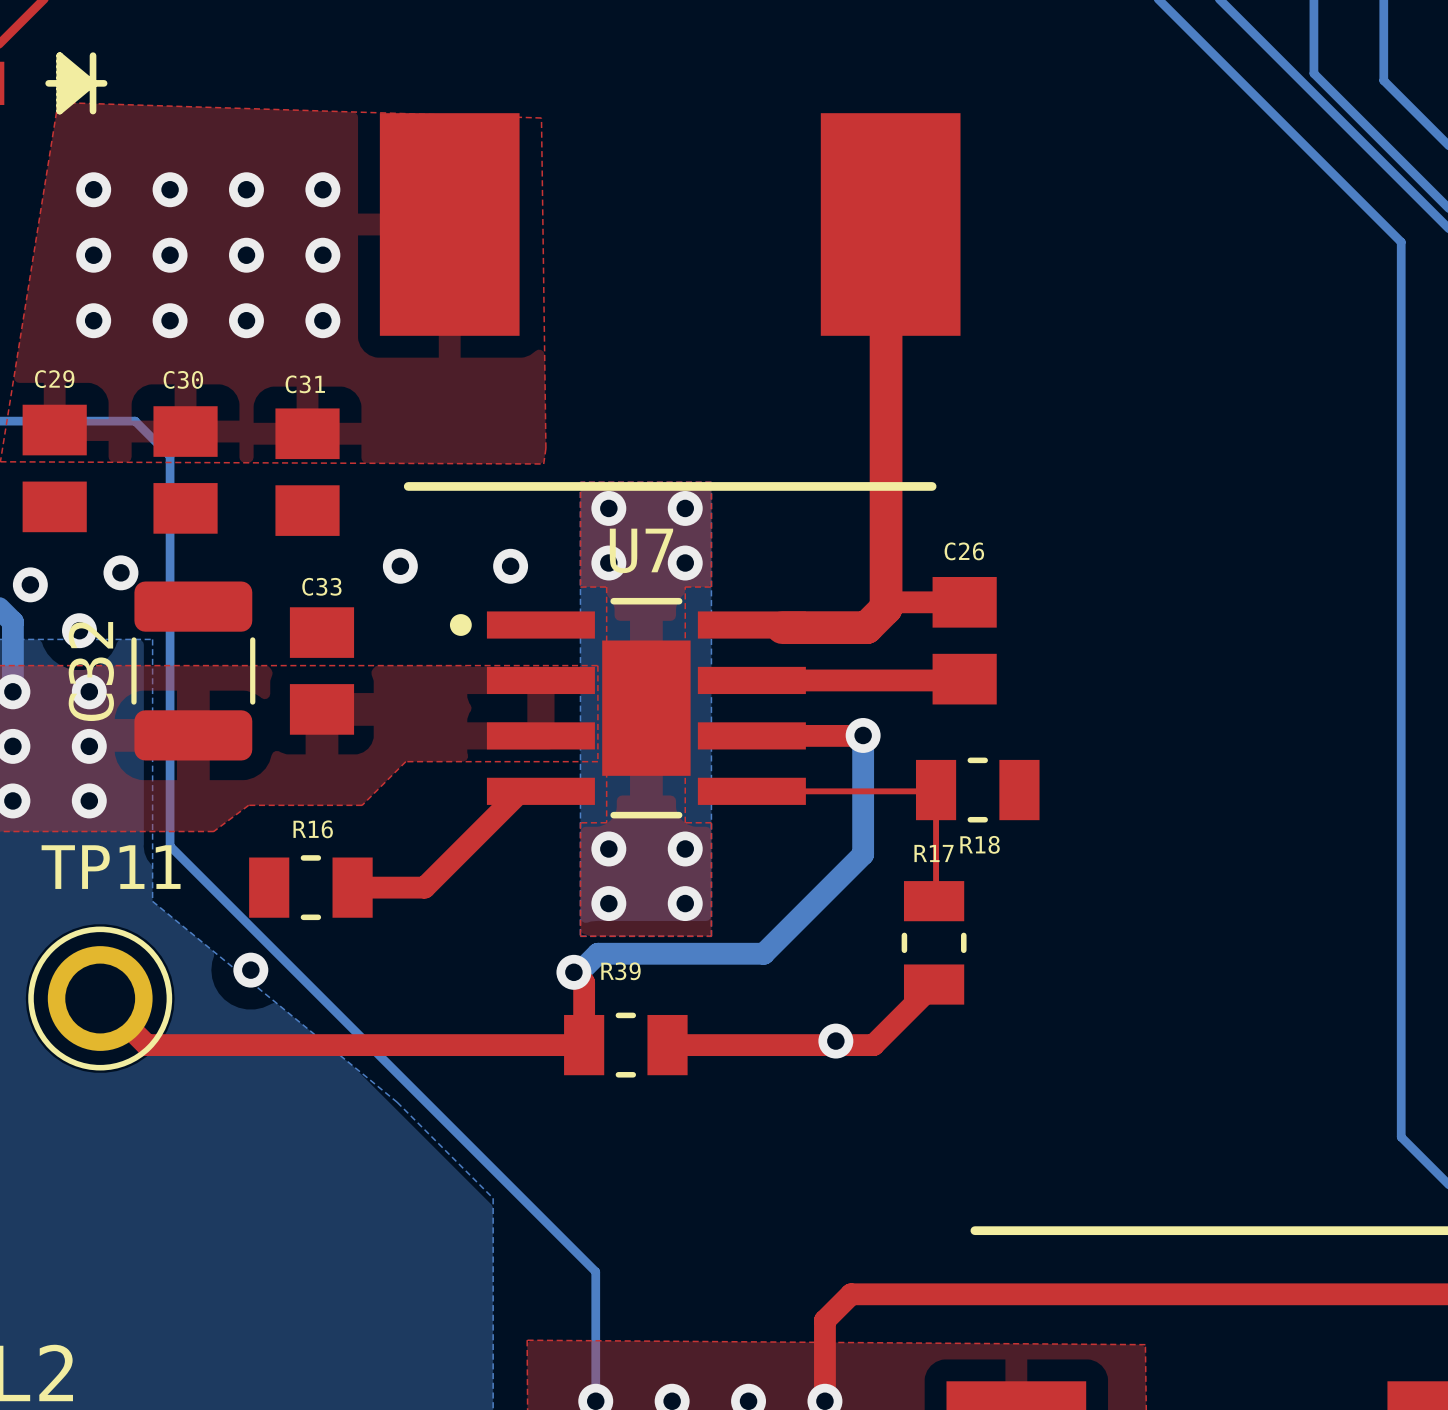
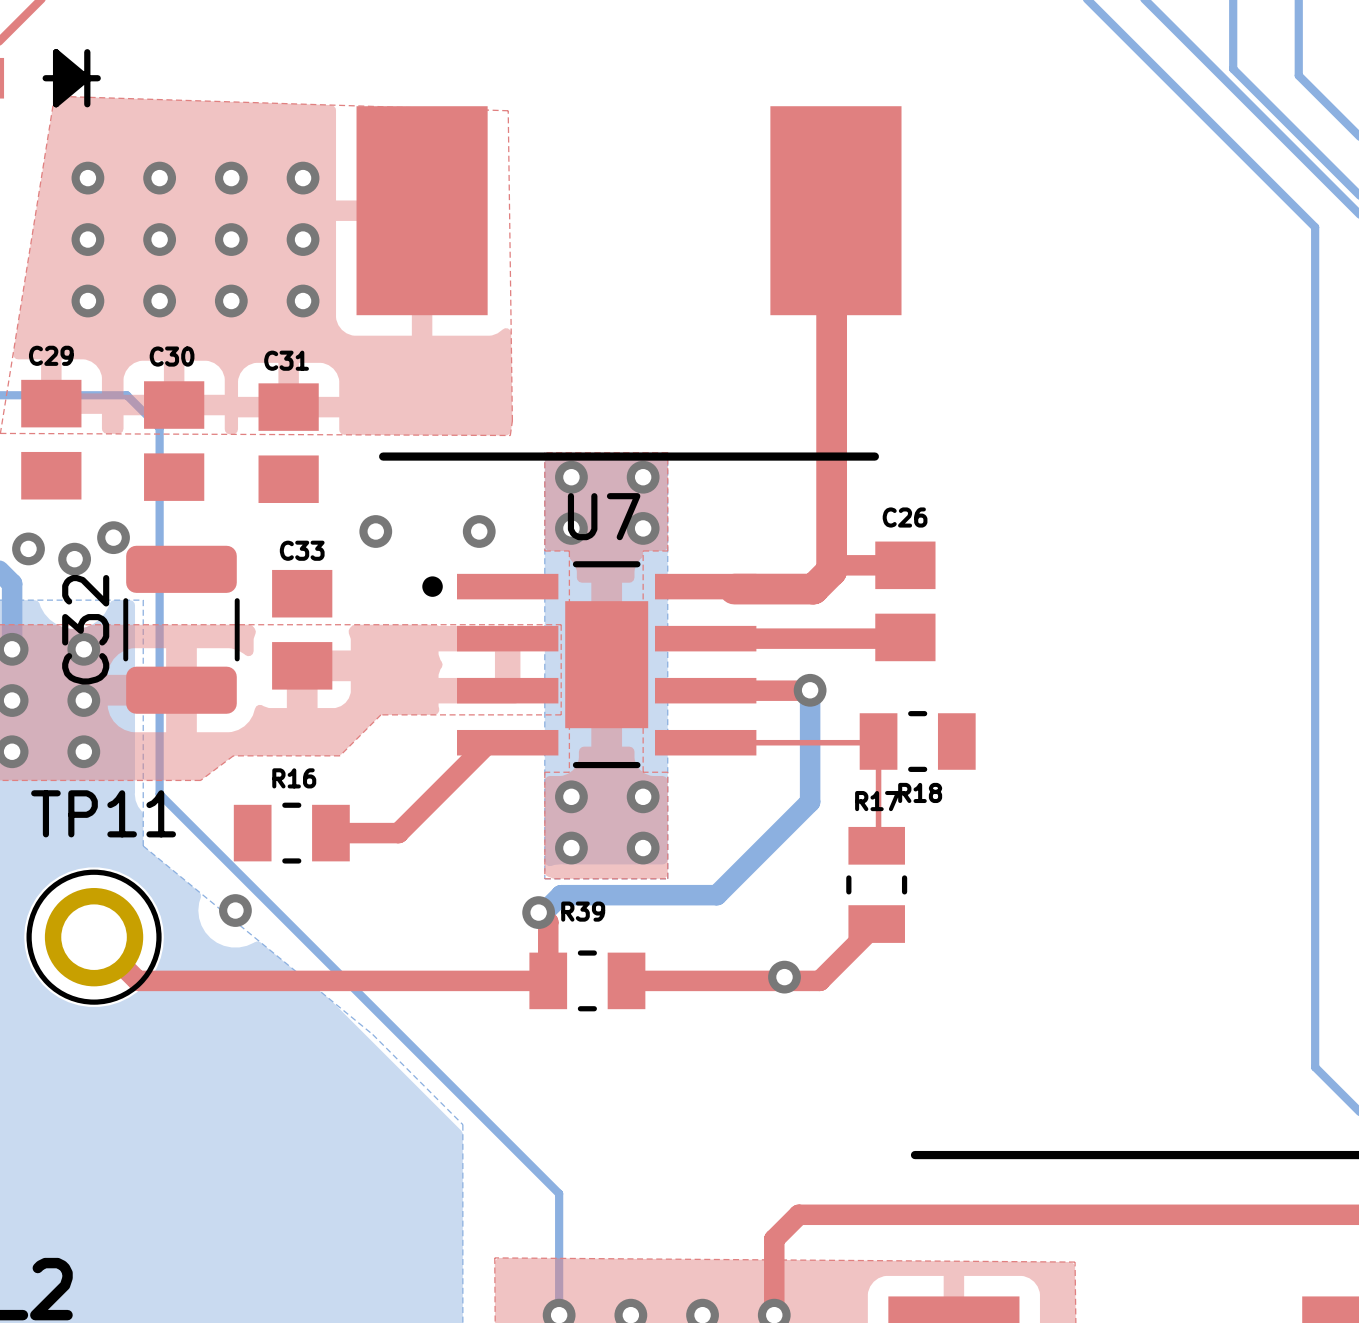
via position: (79, 630) -> (74, 559)

